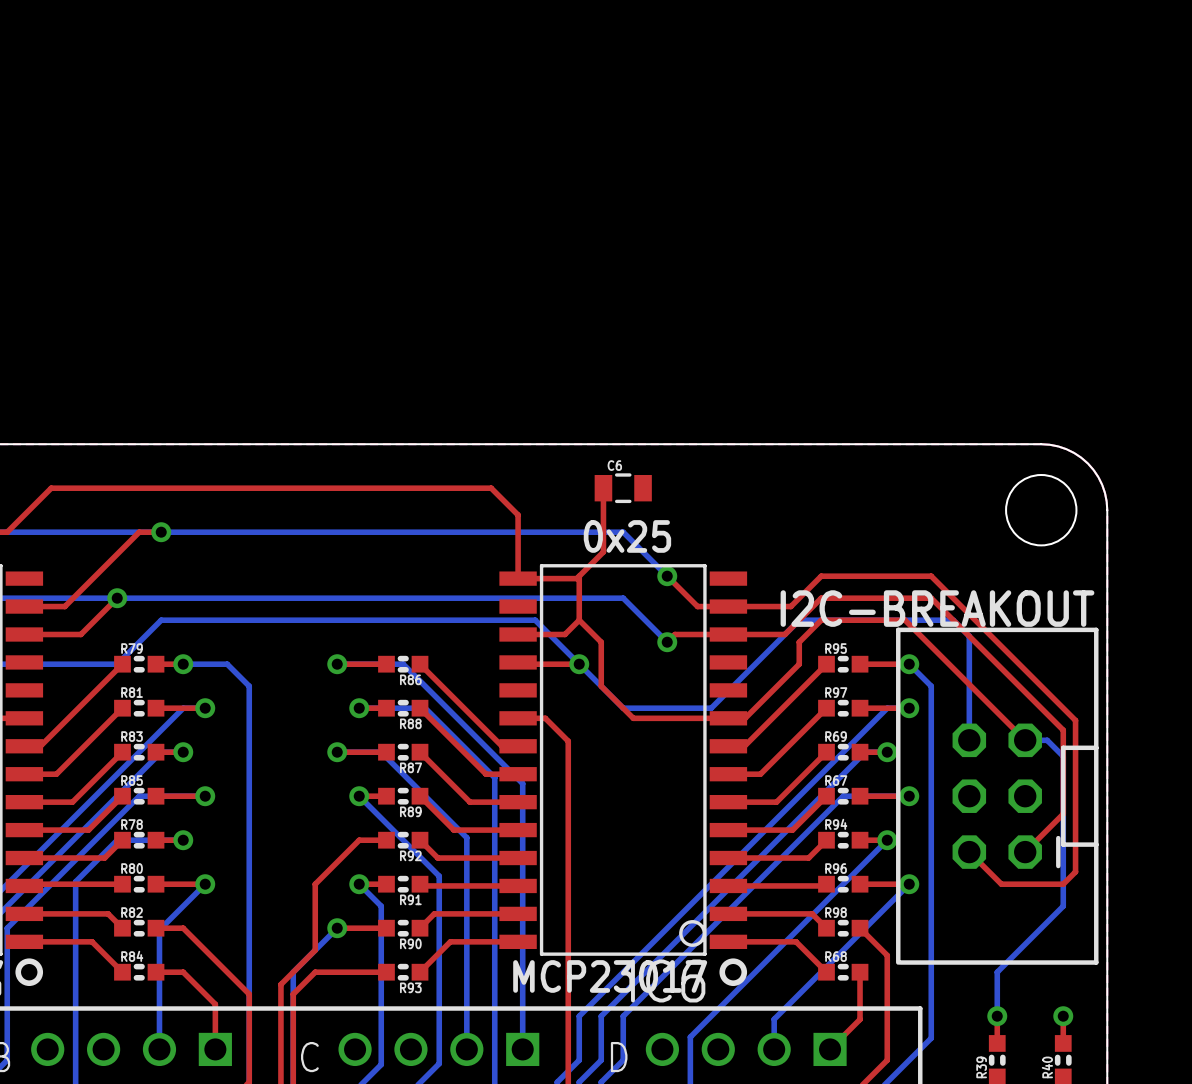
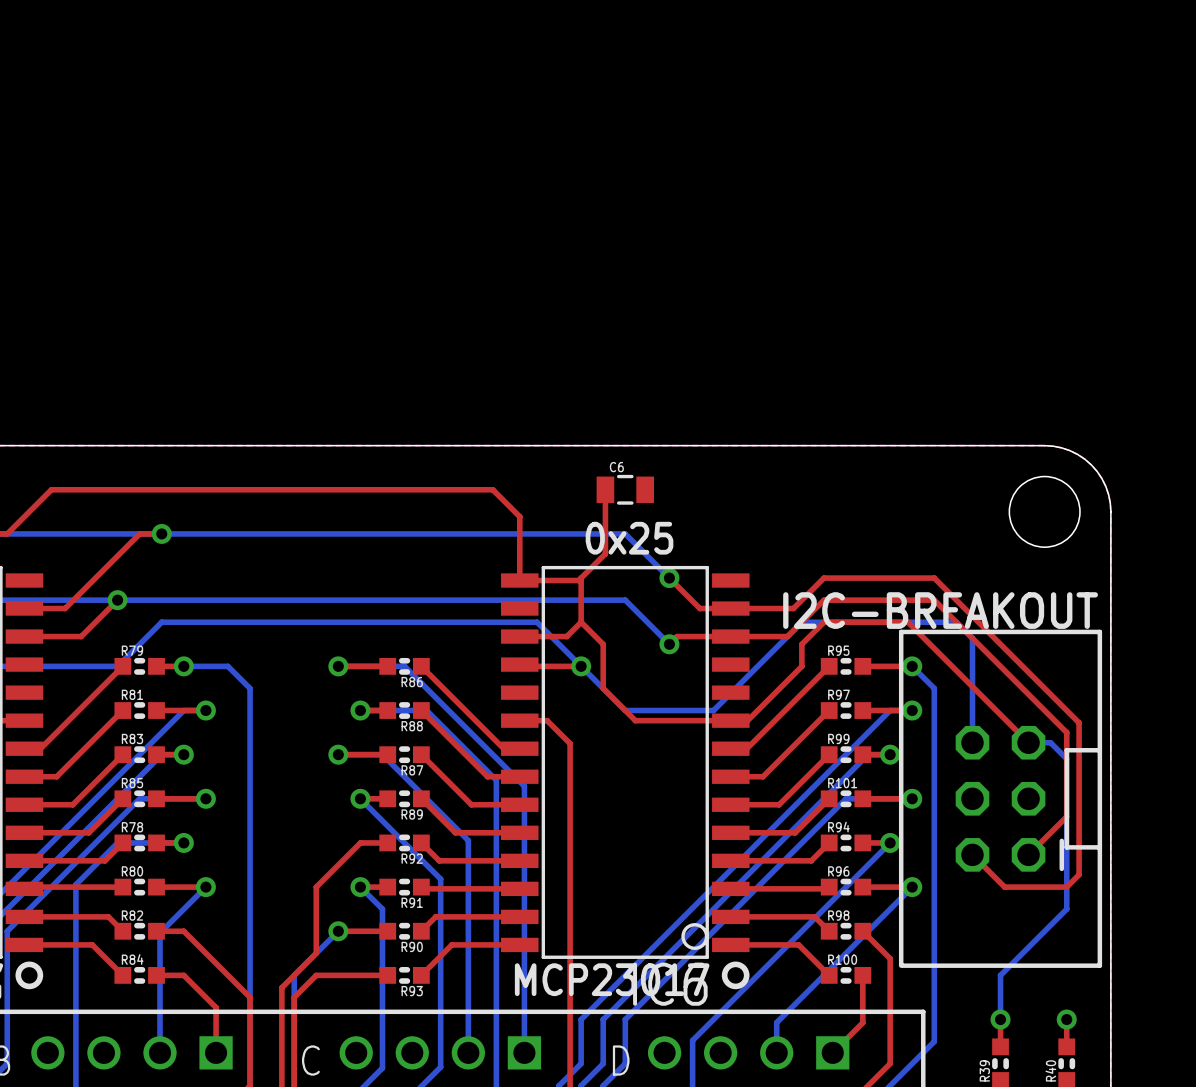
R69 name: R69 (836, 736) -> R99 (838, 738)
R67 name: R67 (836, 780) -> R101 (842, 783)
R68 name: R68 (836, 956) -> R100 (842, 959)

